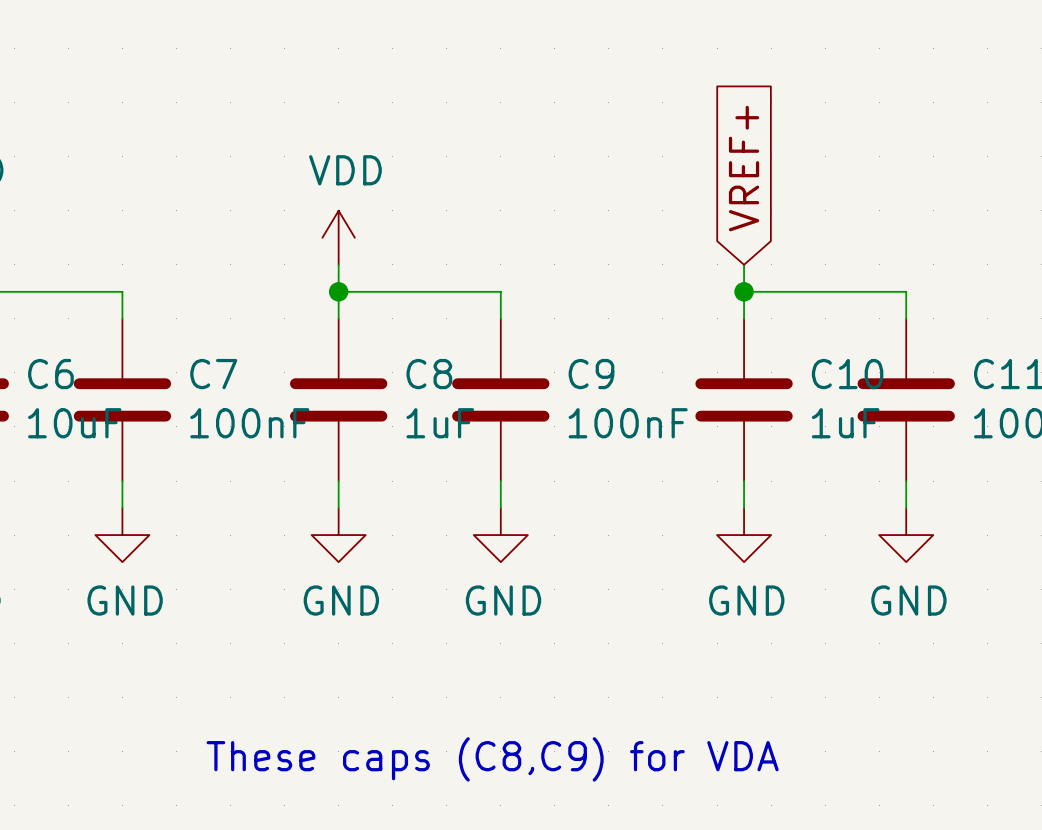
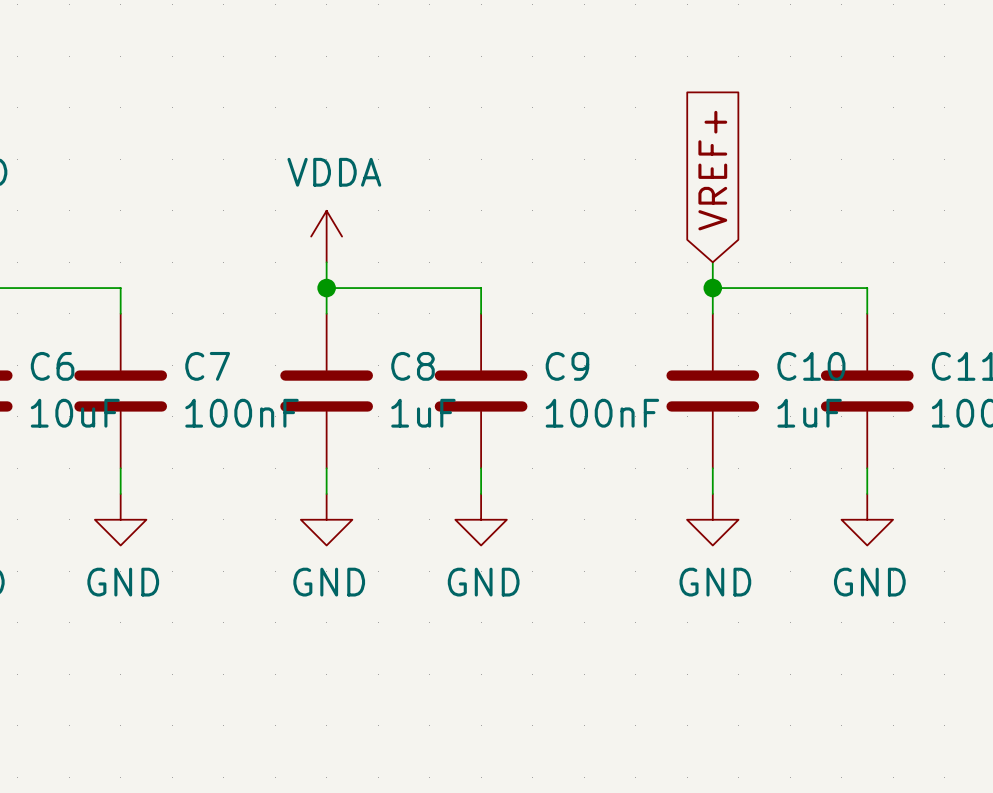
power symbol: VDD (338, 237) -> VDDA (326, 236)
text: These caps (C8,C9) for VDA (492, 759) -> none

